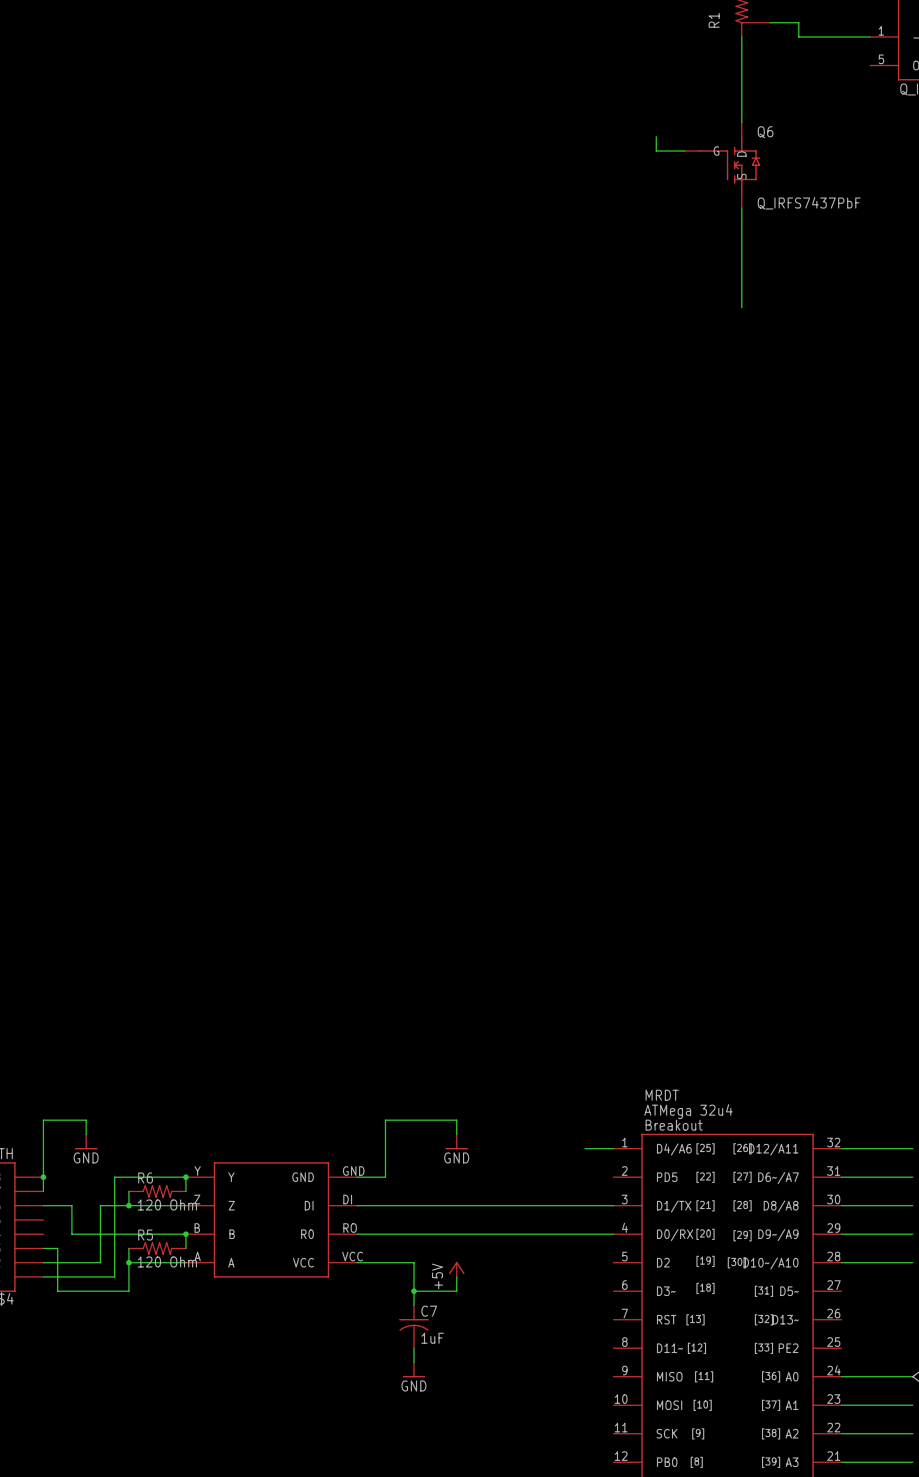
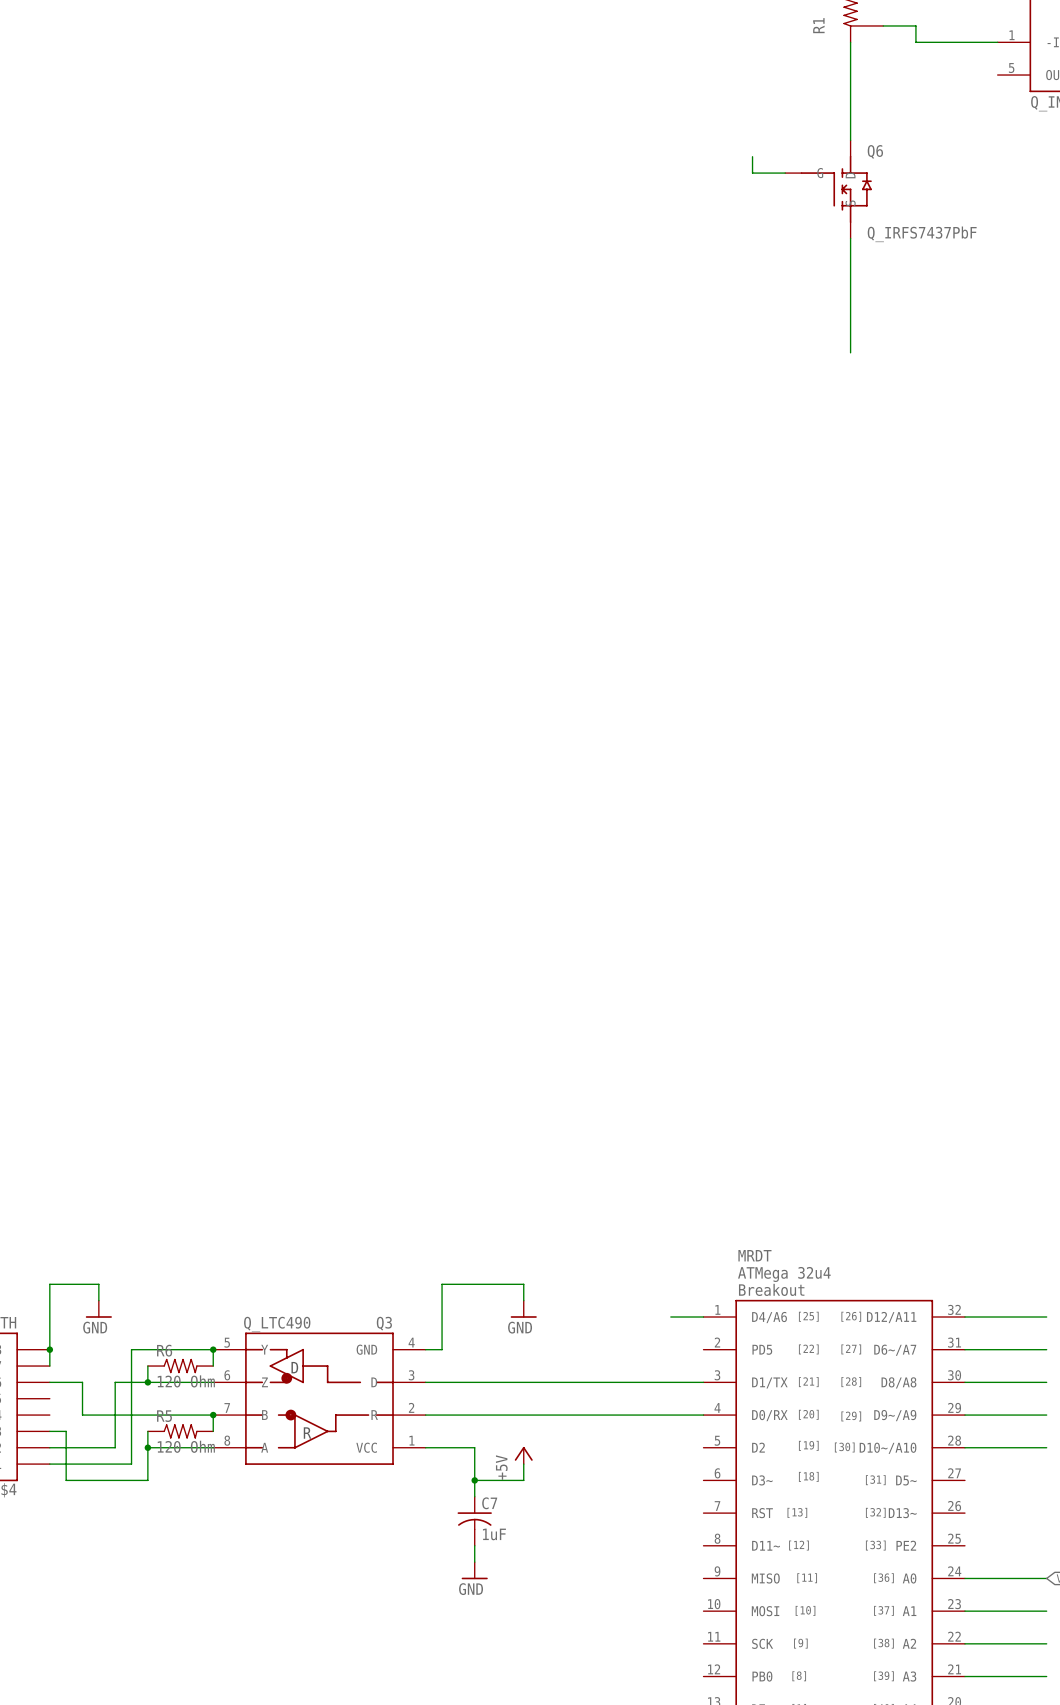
part: (271, 1219) -> none
Q3: none -> Q_LTC490 (319, 1398)

